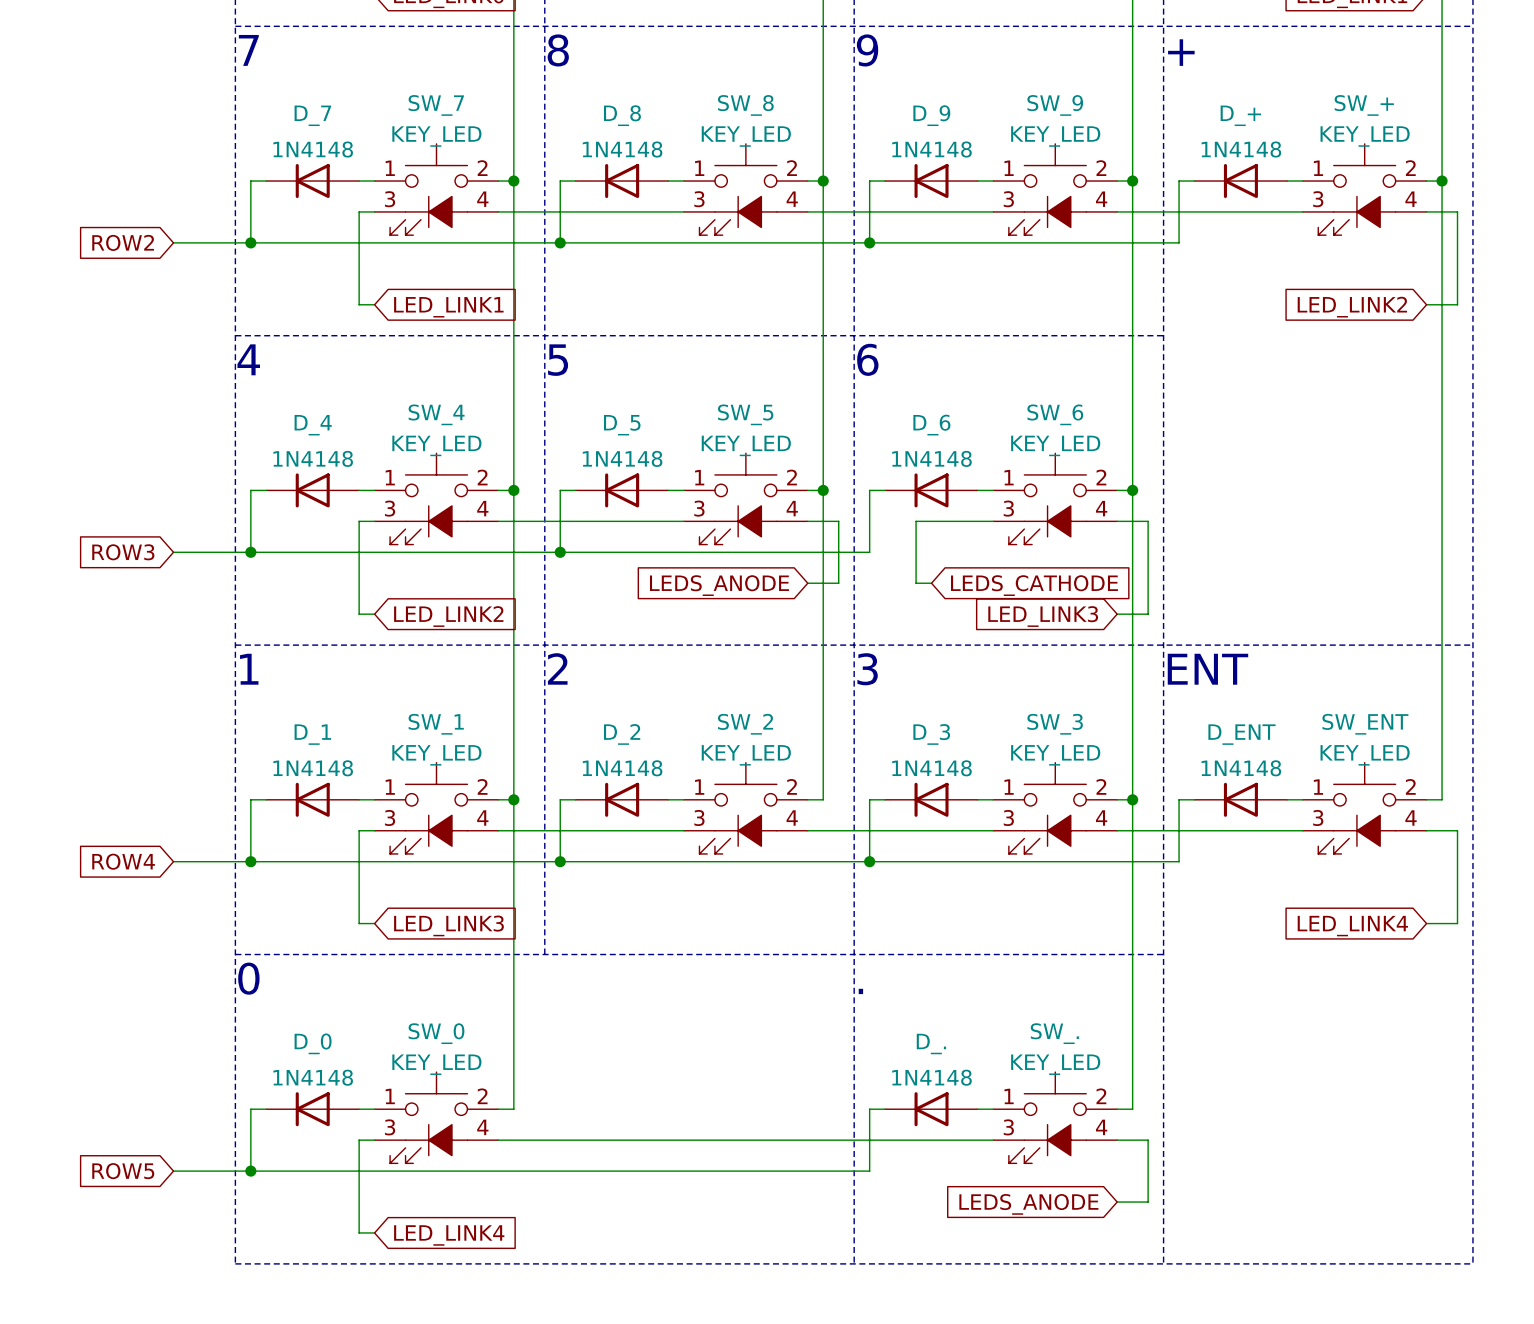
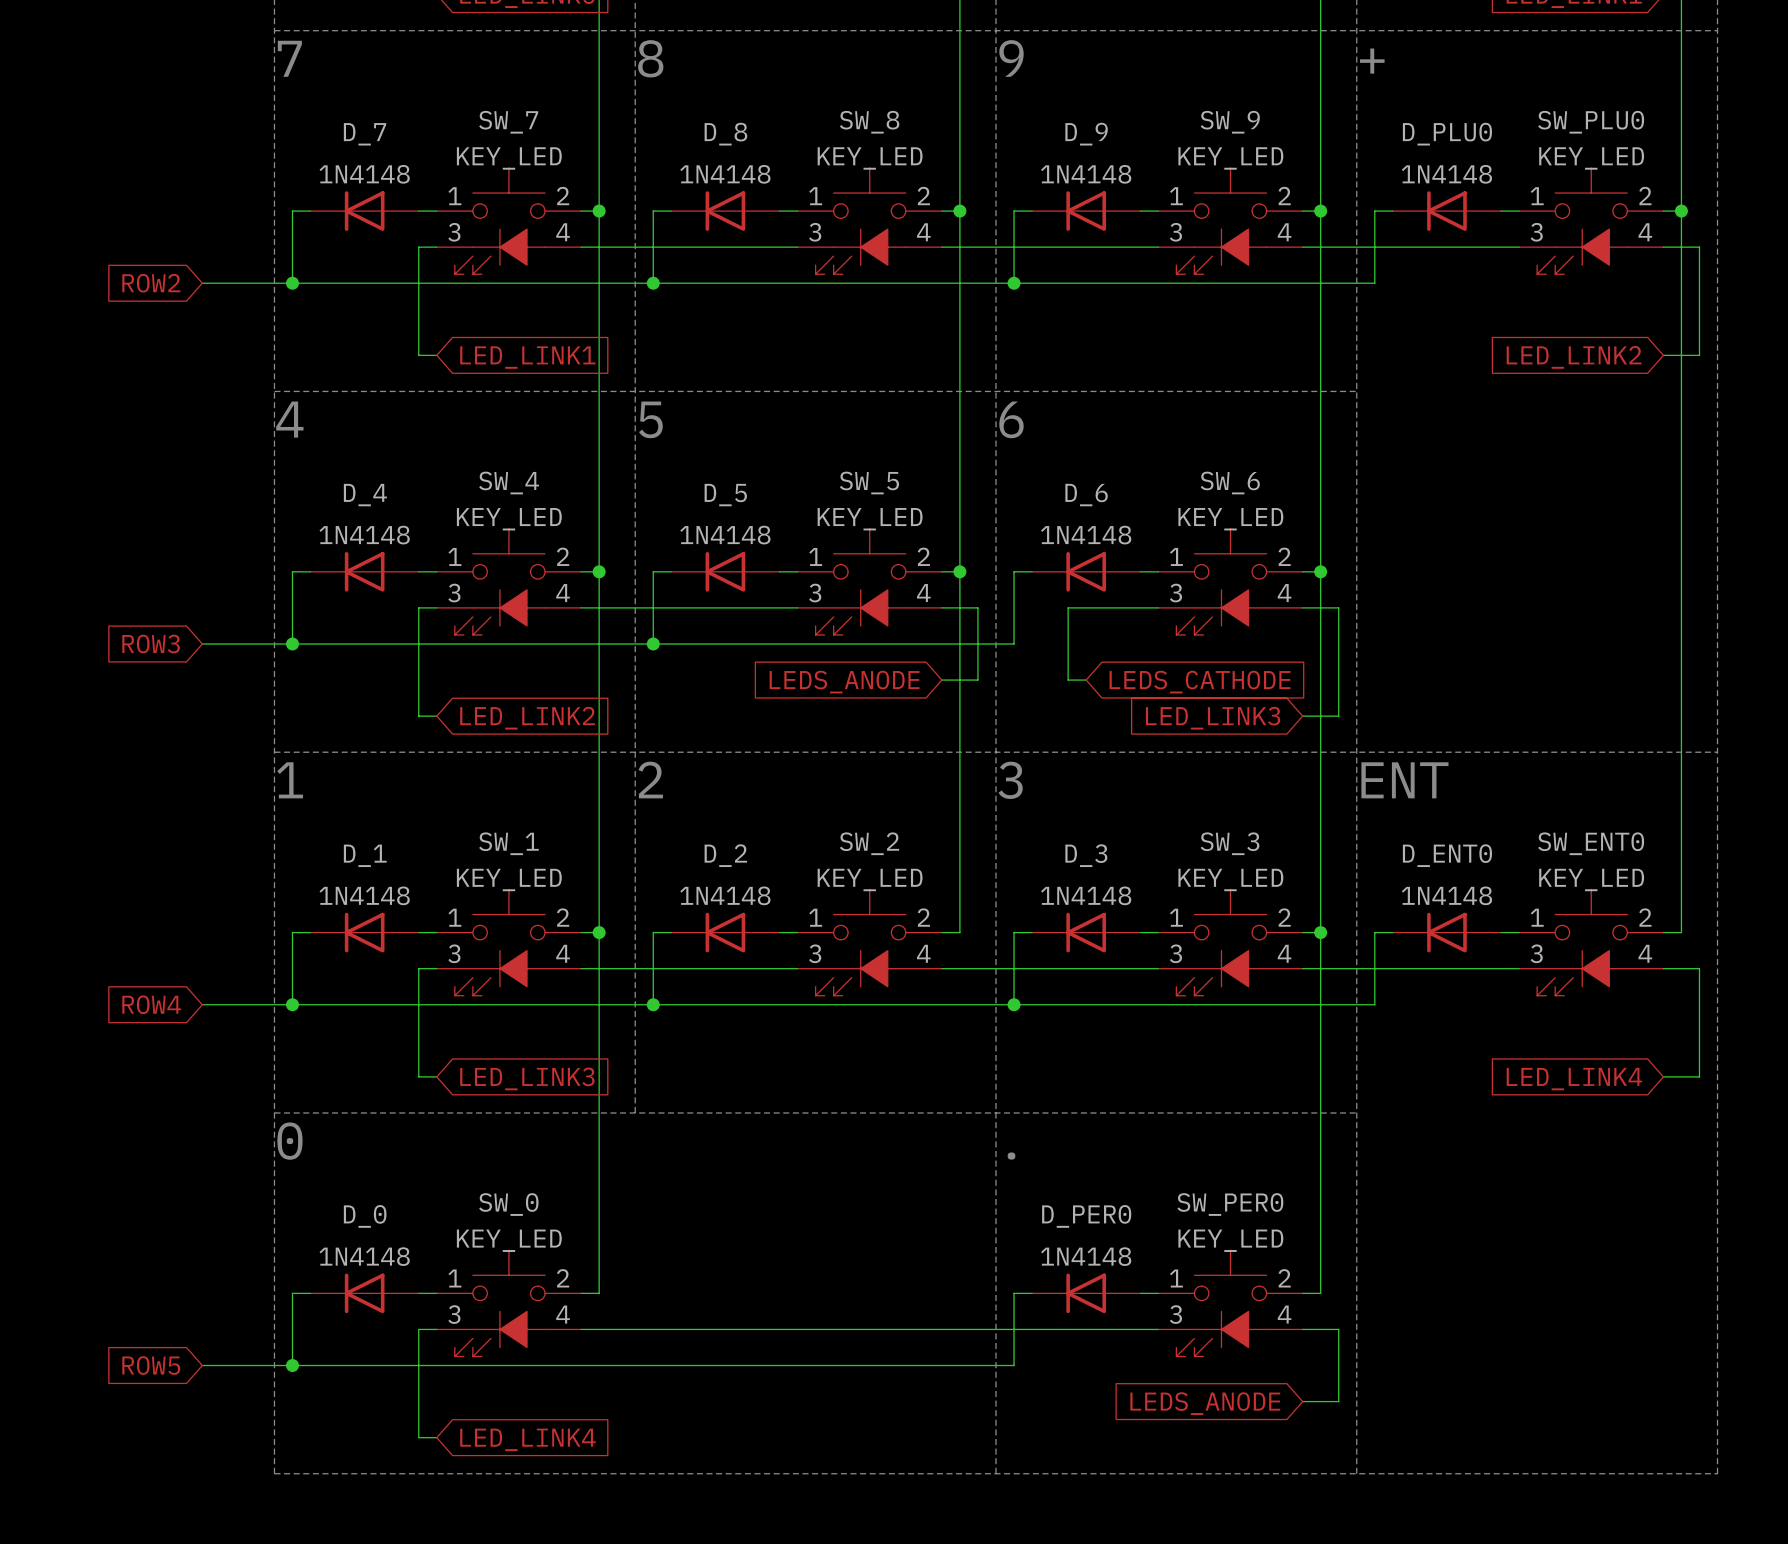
SW_+ name: SW_+ (1364, 105) -> SW_PLU0 (1591, 122)
D_+ name: D_+ (1240, 115) -> D_PLU0 (1447, 134)
SW_ENT name: SW_ENT (1365, 724) -> SW_ENT0 (1591, 843)
D_ENT name: D_ENT (1242, 734) -> D_ENT0 (1447, 855)
SW_. name: SW_. (1054, 1033) -> SW_PER0 (1230, 1204)
D_. name: D_. (931, 1043) -> D_PER0 (1086, 1216)

